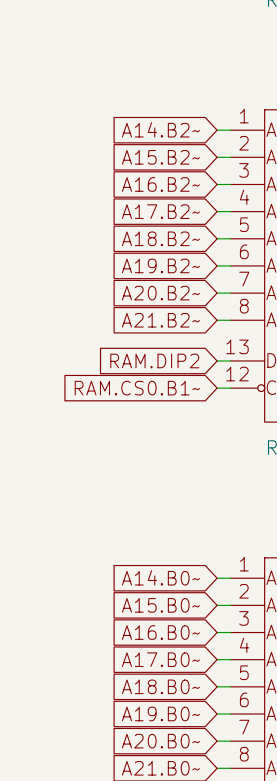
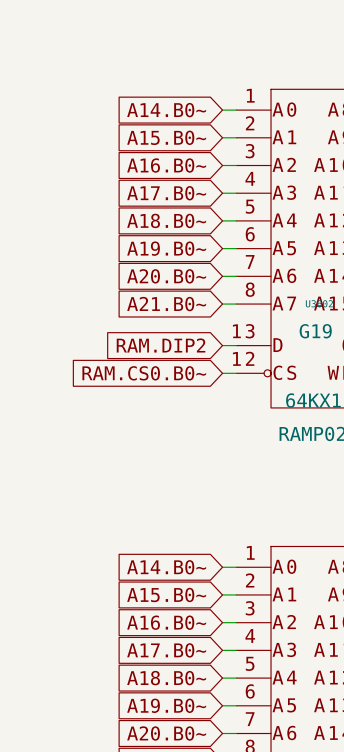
global label: A14.B2~ (160, 129) -> A14.B0~ (166, 110)
global label: A15.B2~ (160, 157) -> A15.B0~ (166, 137)
global label: A16.B2~ (160, 184) -> A16.B0~ (166, 165)
global label: A17.B2~ (160, 211) -> A17.B0~ (166, 193)
global label: A18.B2~ (160, 238) -> A18.B0~ (166, 220)
global label: A19.B2~ (160, 265) -> A19.B0~ (166, 248)
global label: A20.B2~ (160, 293) -> A20.B0~ (166, 276)
global label: A21.B2~ (160, 320) -> A21.B0~ (166, 304)
global label: RAM.CS0.B1~ (137, 388) -> RAM.CS0.B0~ (144, 373)

